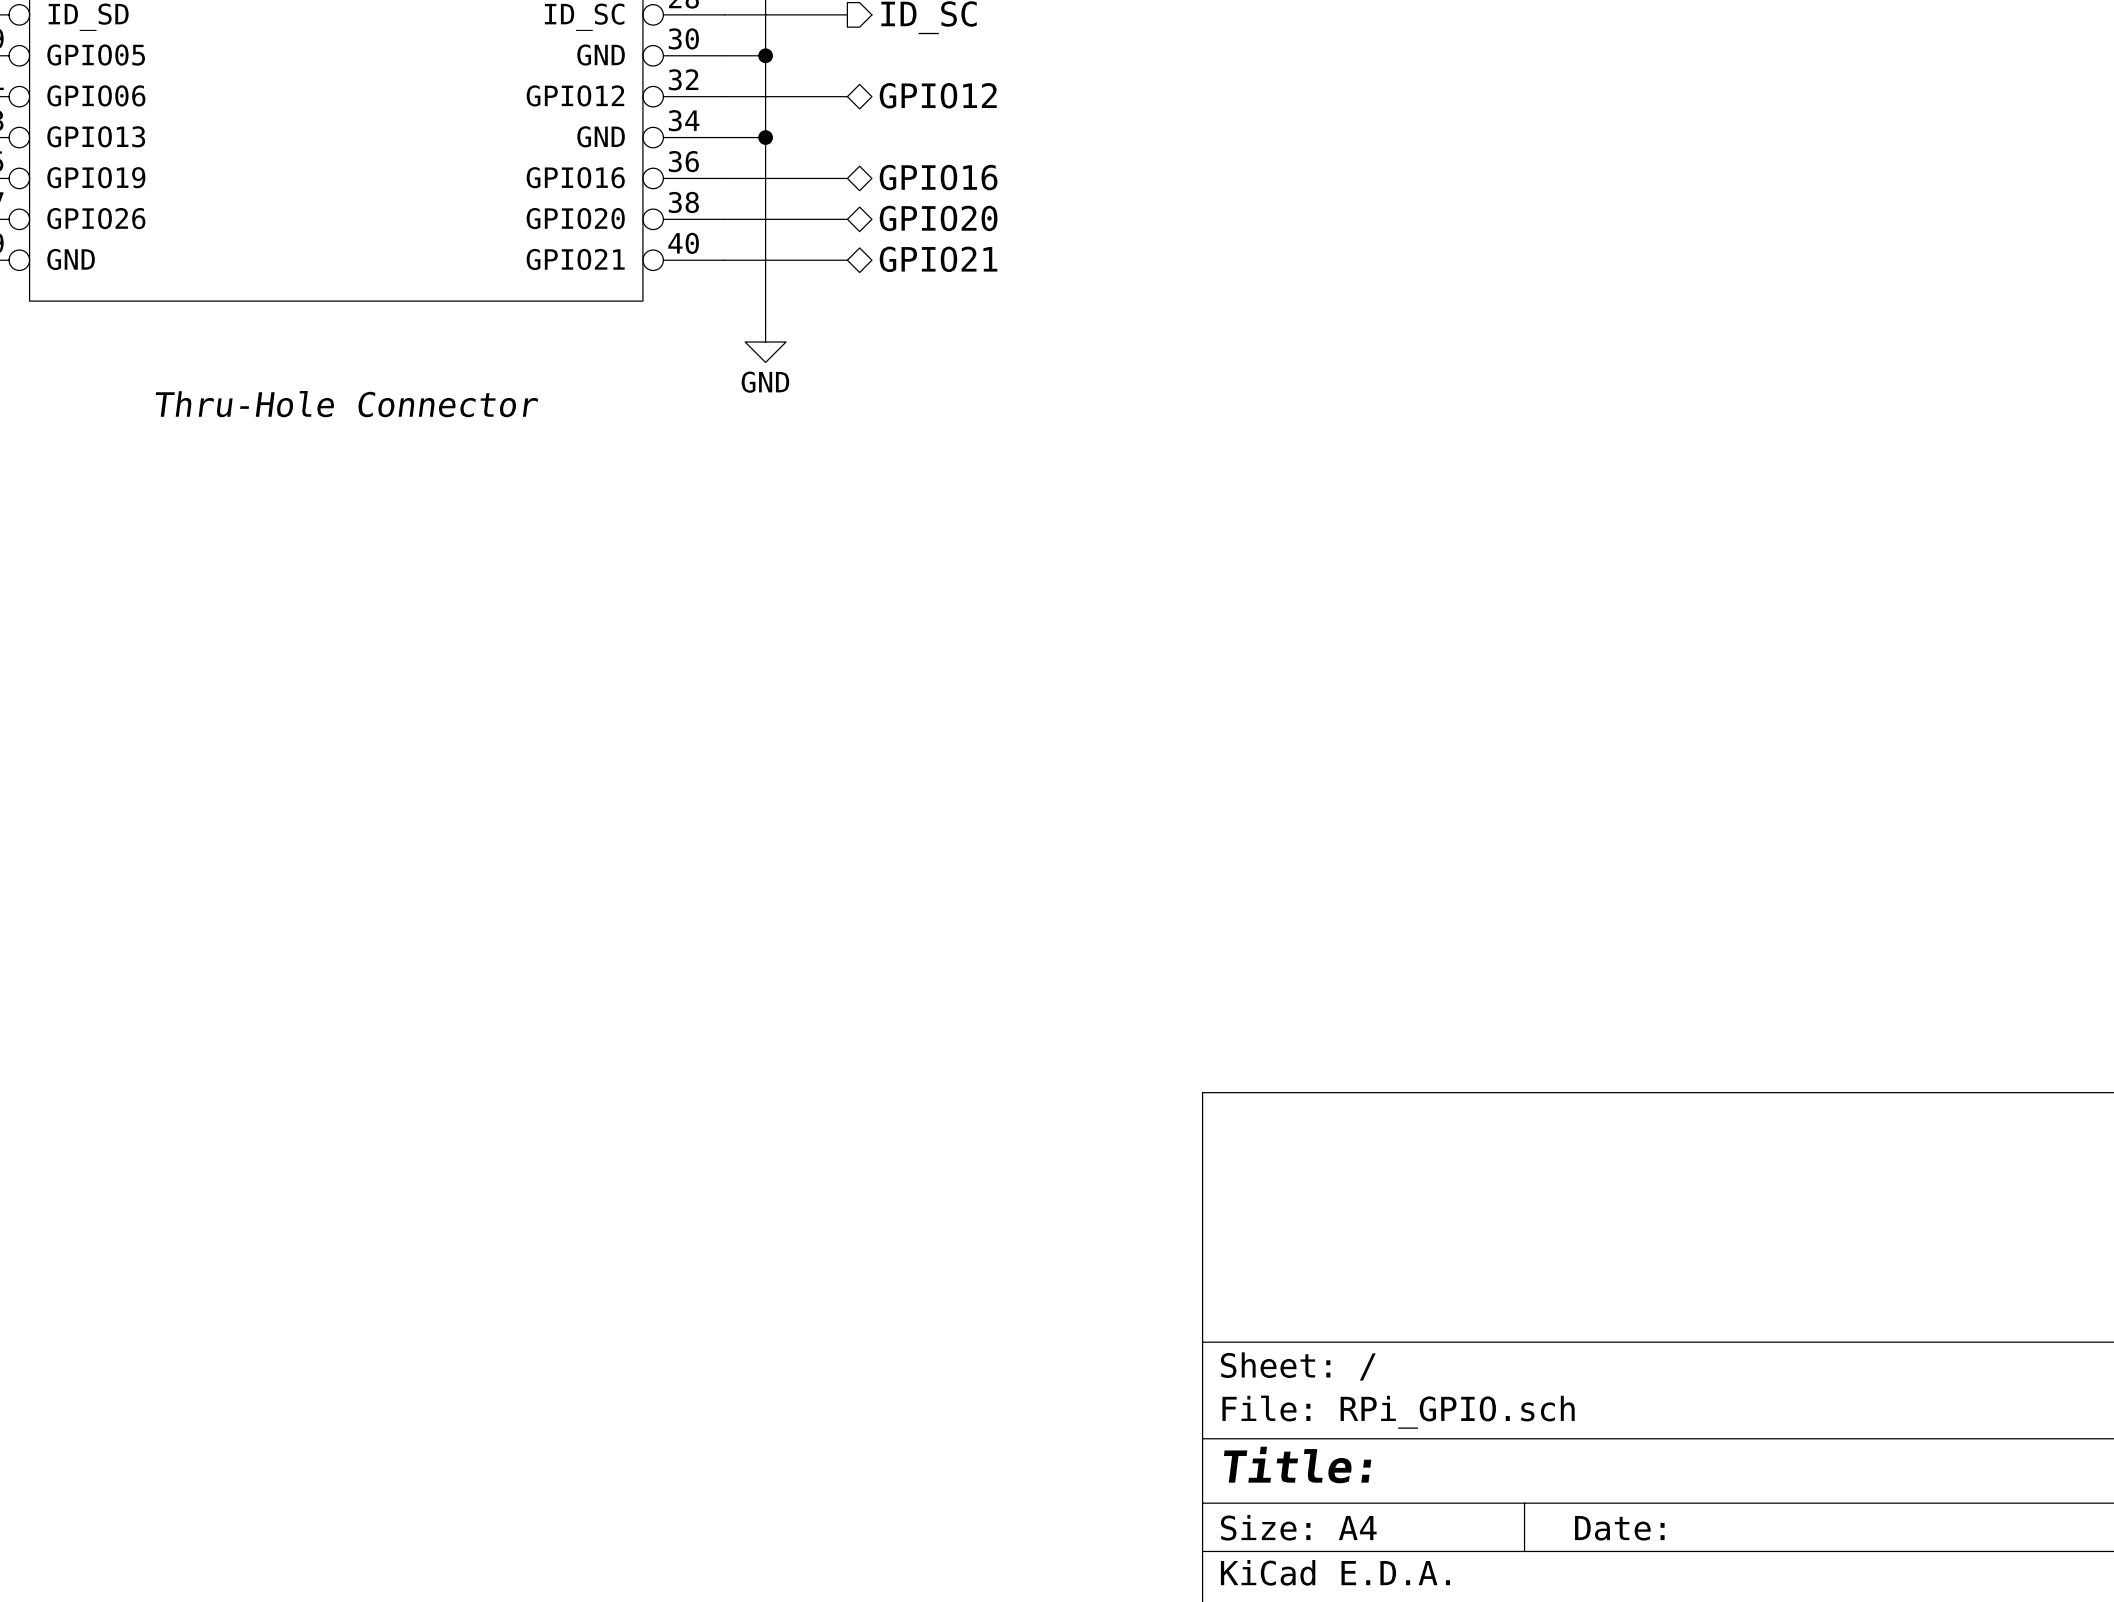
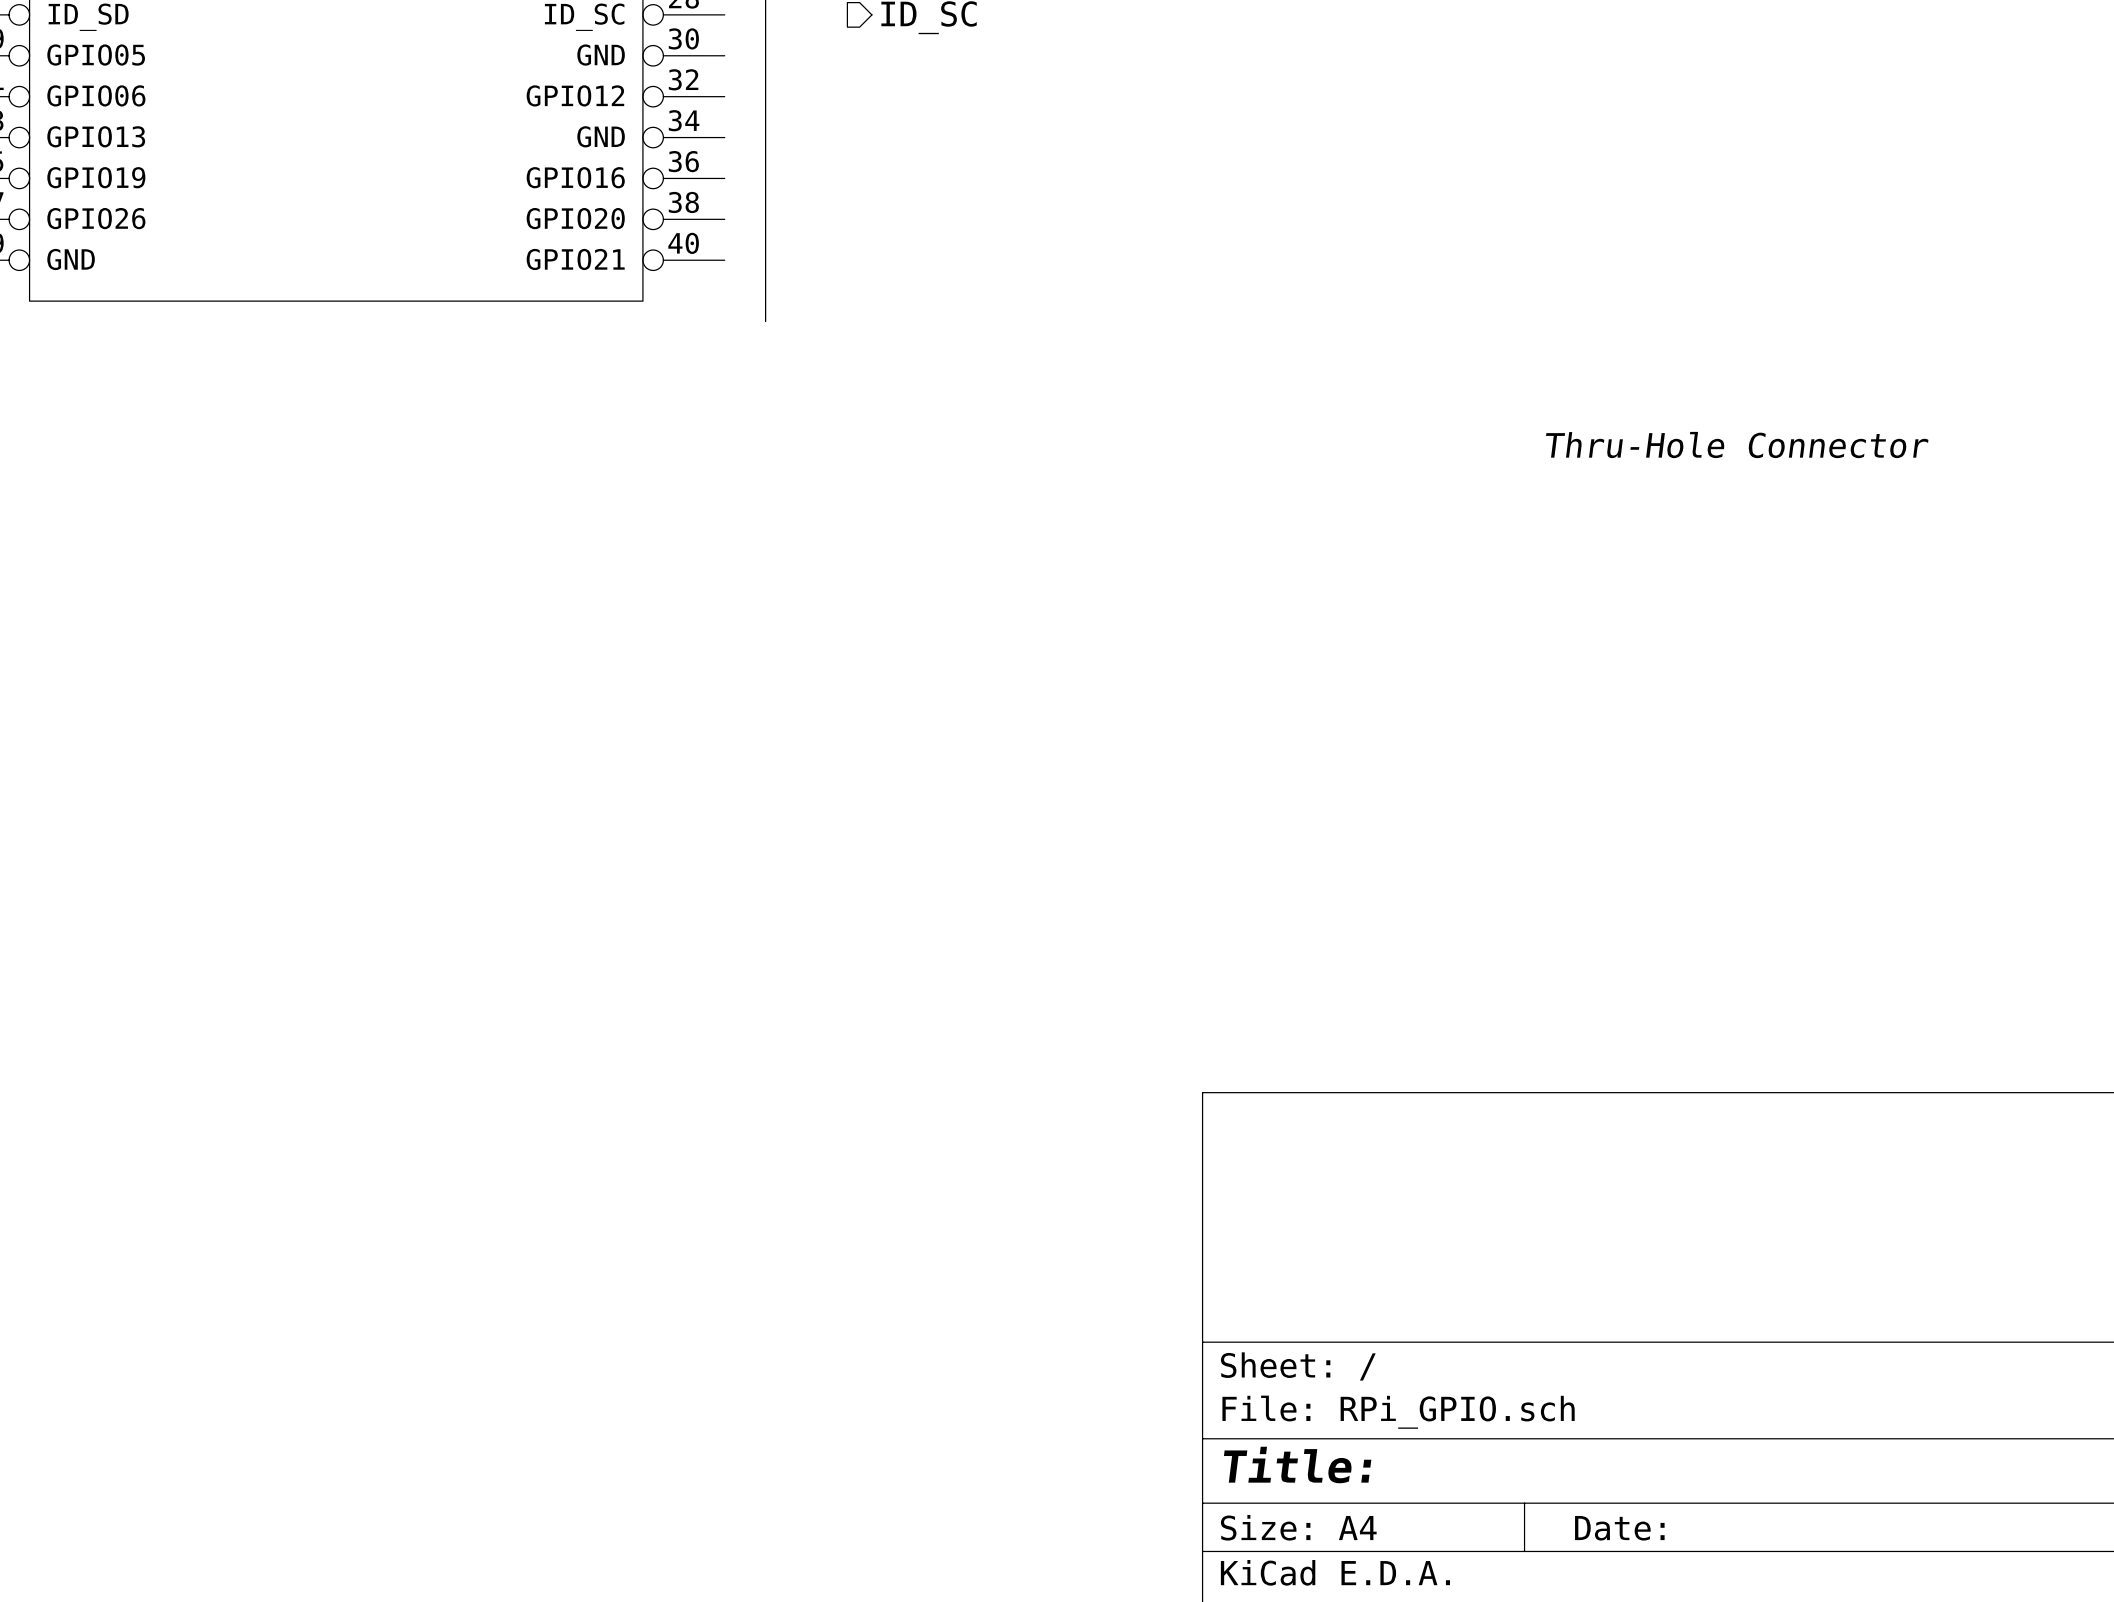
wire: (724, 14) (847, 14) -> none
wire: (724, 55) (765, 55) -> none
junction: (765, 55) -> none
hierarchical label: GPIO12 (938, 95) -> none
wire: (724, 96) (847, 96) -> none
wire: (724, 137) (765, 137) -> none
junction: (765, 137) -> none
hierarchical label: GPIO16 (938, 177) -> none
wire: (724, 178) (847, 178) -> none
hierarchical label: GPIO20 (938, 218) -> none
wire: (724, 219) (847, 219) -> none
hierarchical label: GPIO21 (938, 259) -> none
wire: (724, 260) (847, 260) -> none
power symbol: GND (765, 342) -> none
text: Thru-Hole Connector (346, 404) -> none
text: none -> Thru-Hole Connector (1737, 445)

